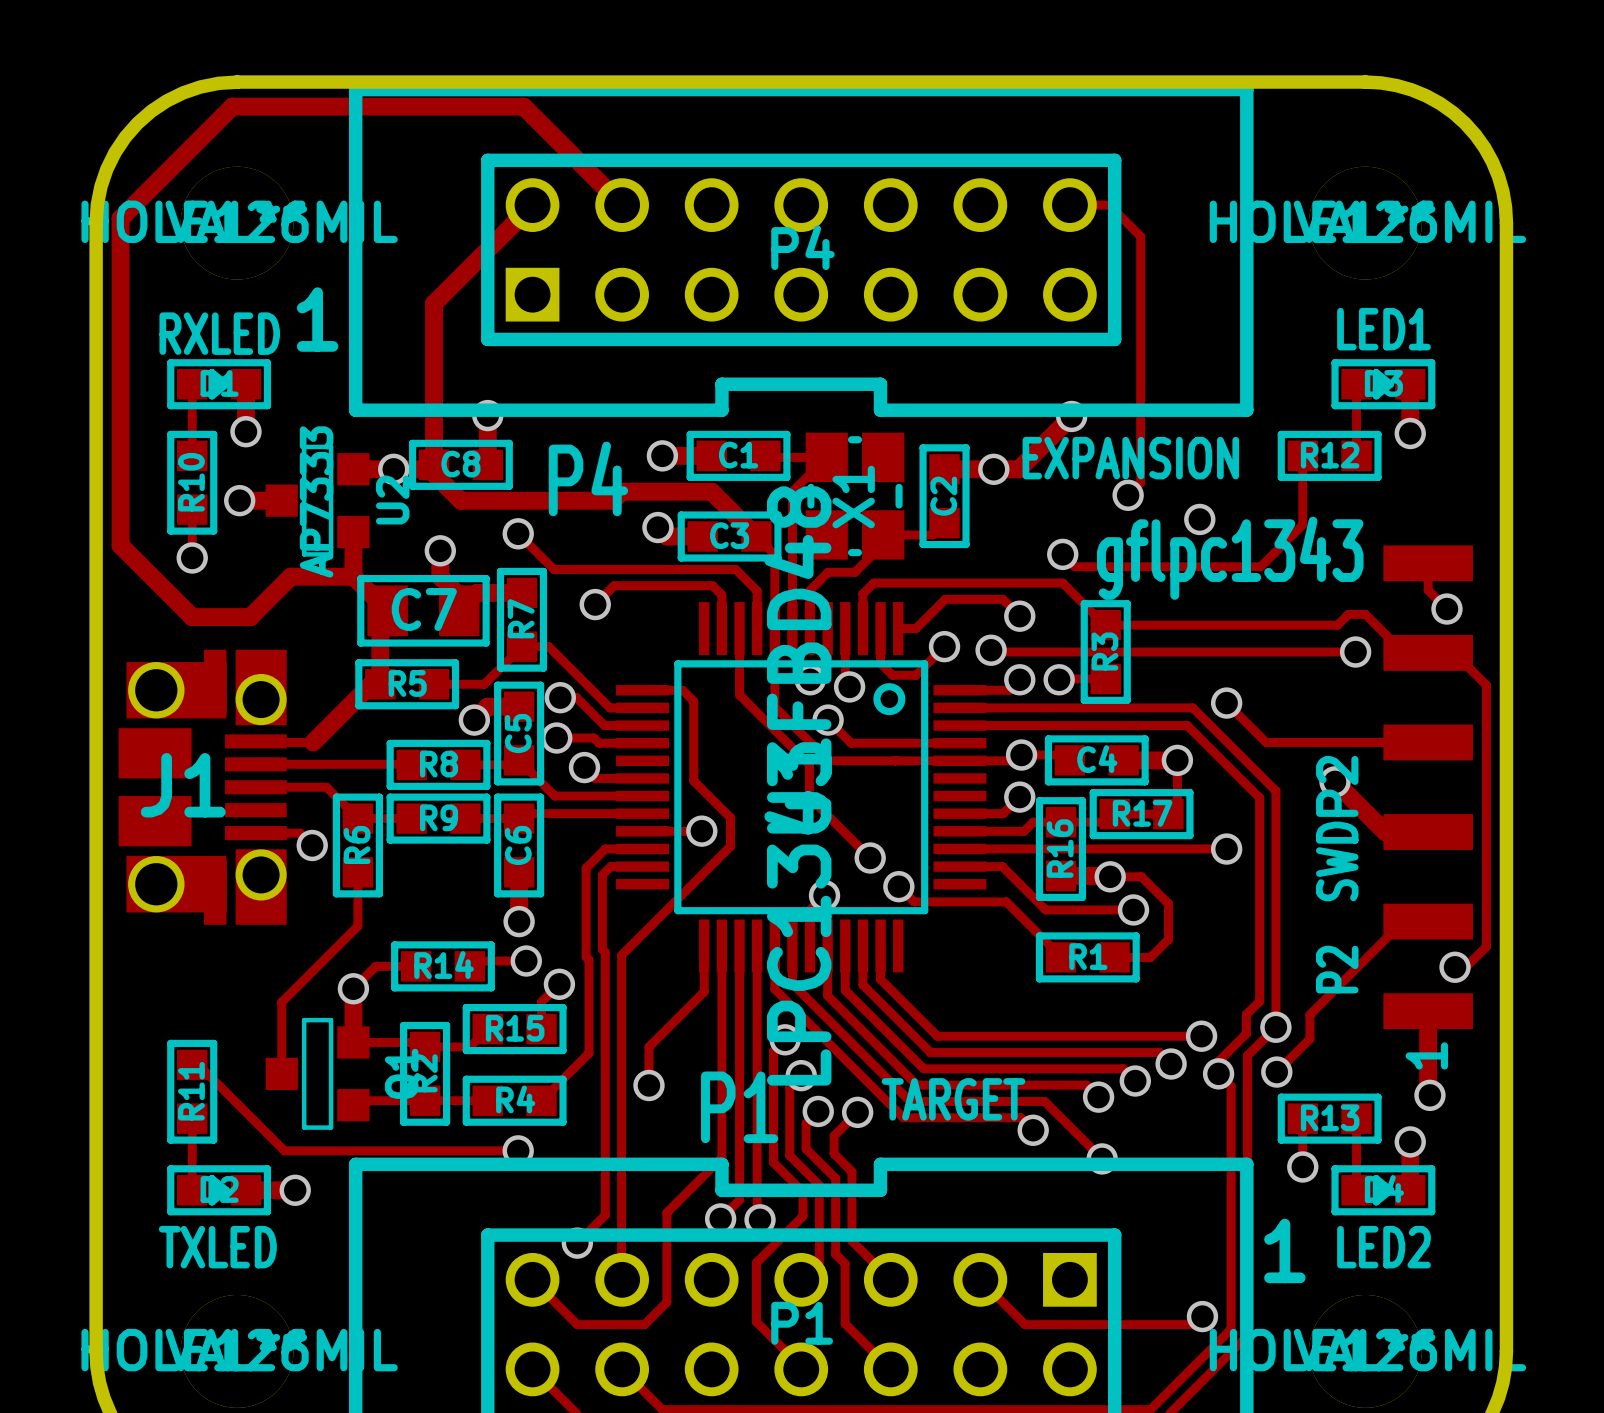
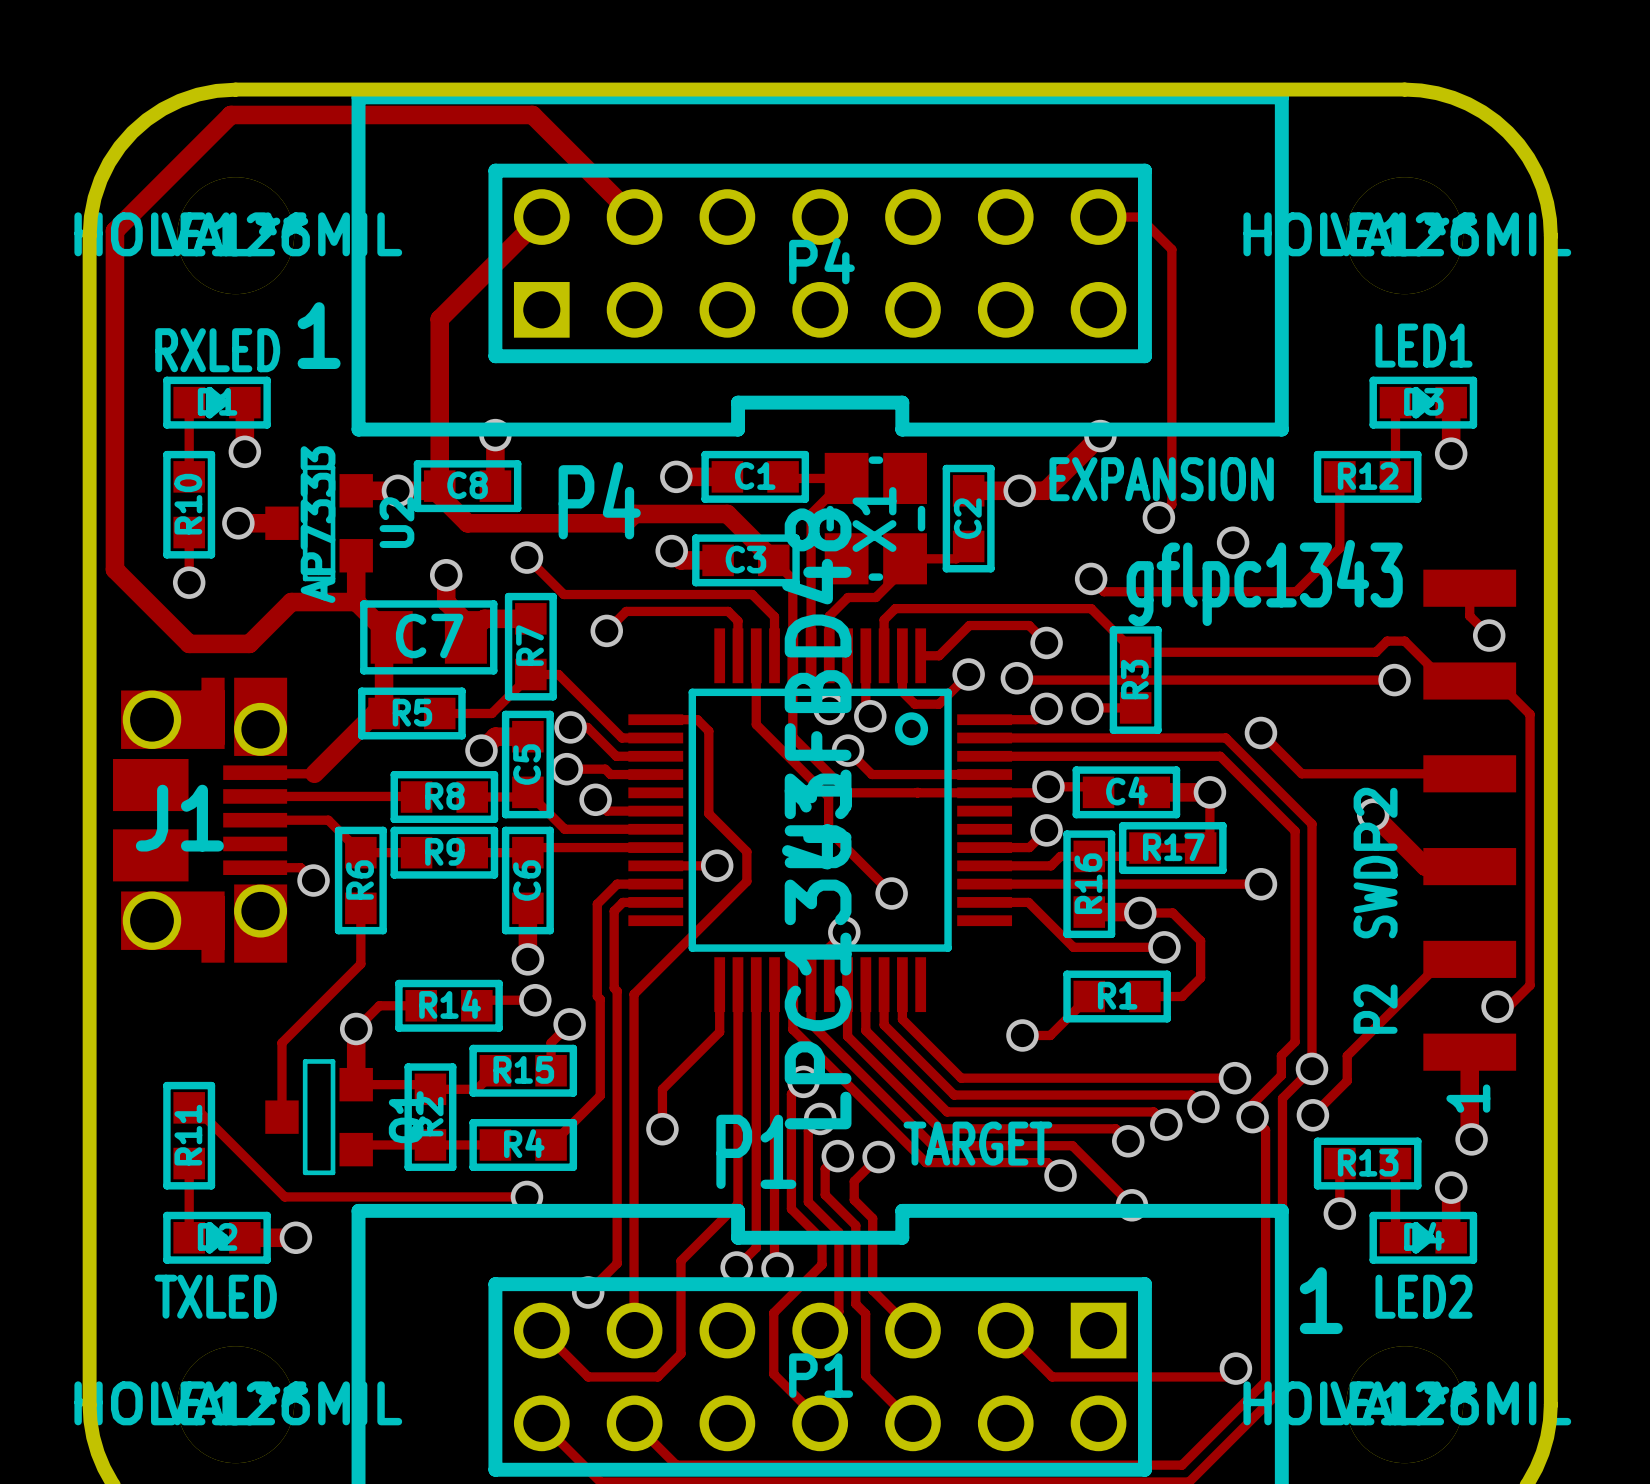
track: (898, 886) (914, 901) (1006, 901) (1060, 957) -> (1022, 1035) (1050, 1035) (1089, 996)
via position: (898, 886) -> (1022, 1035)

